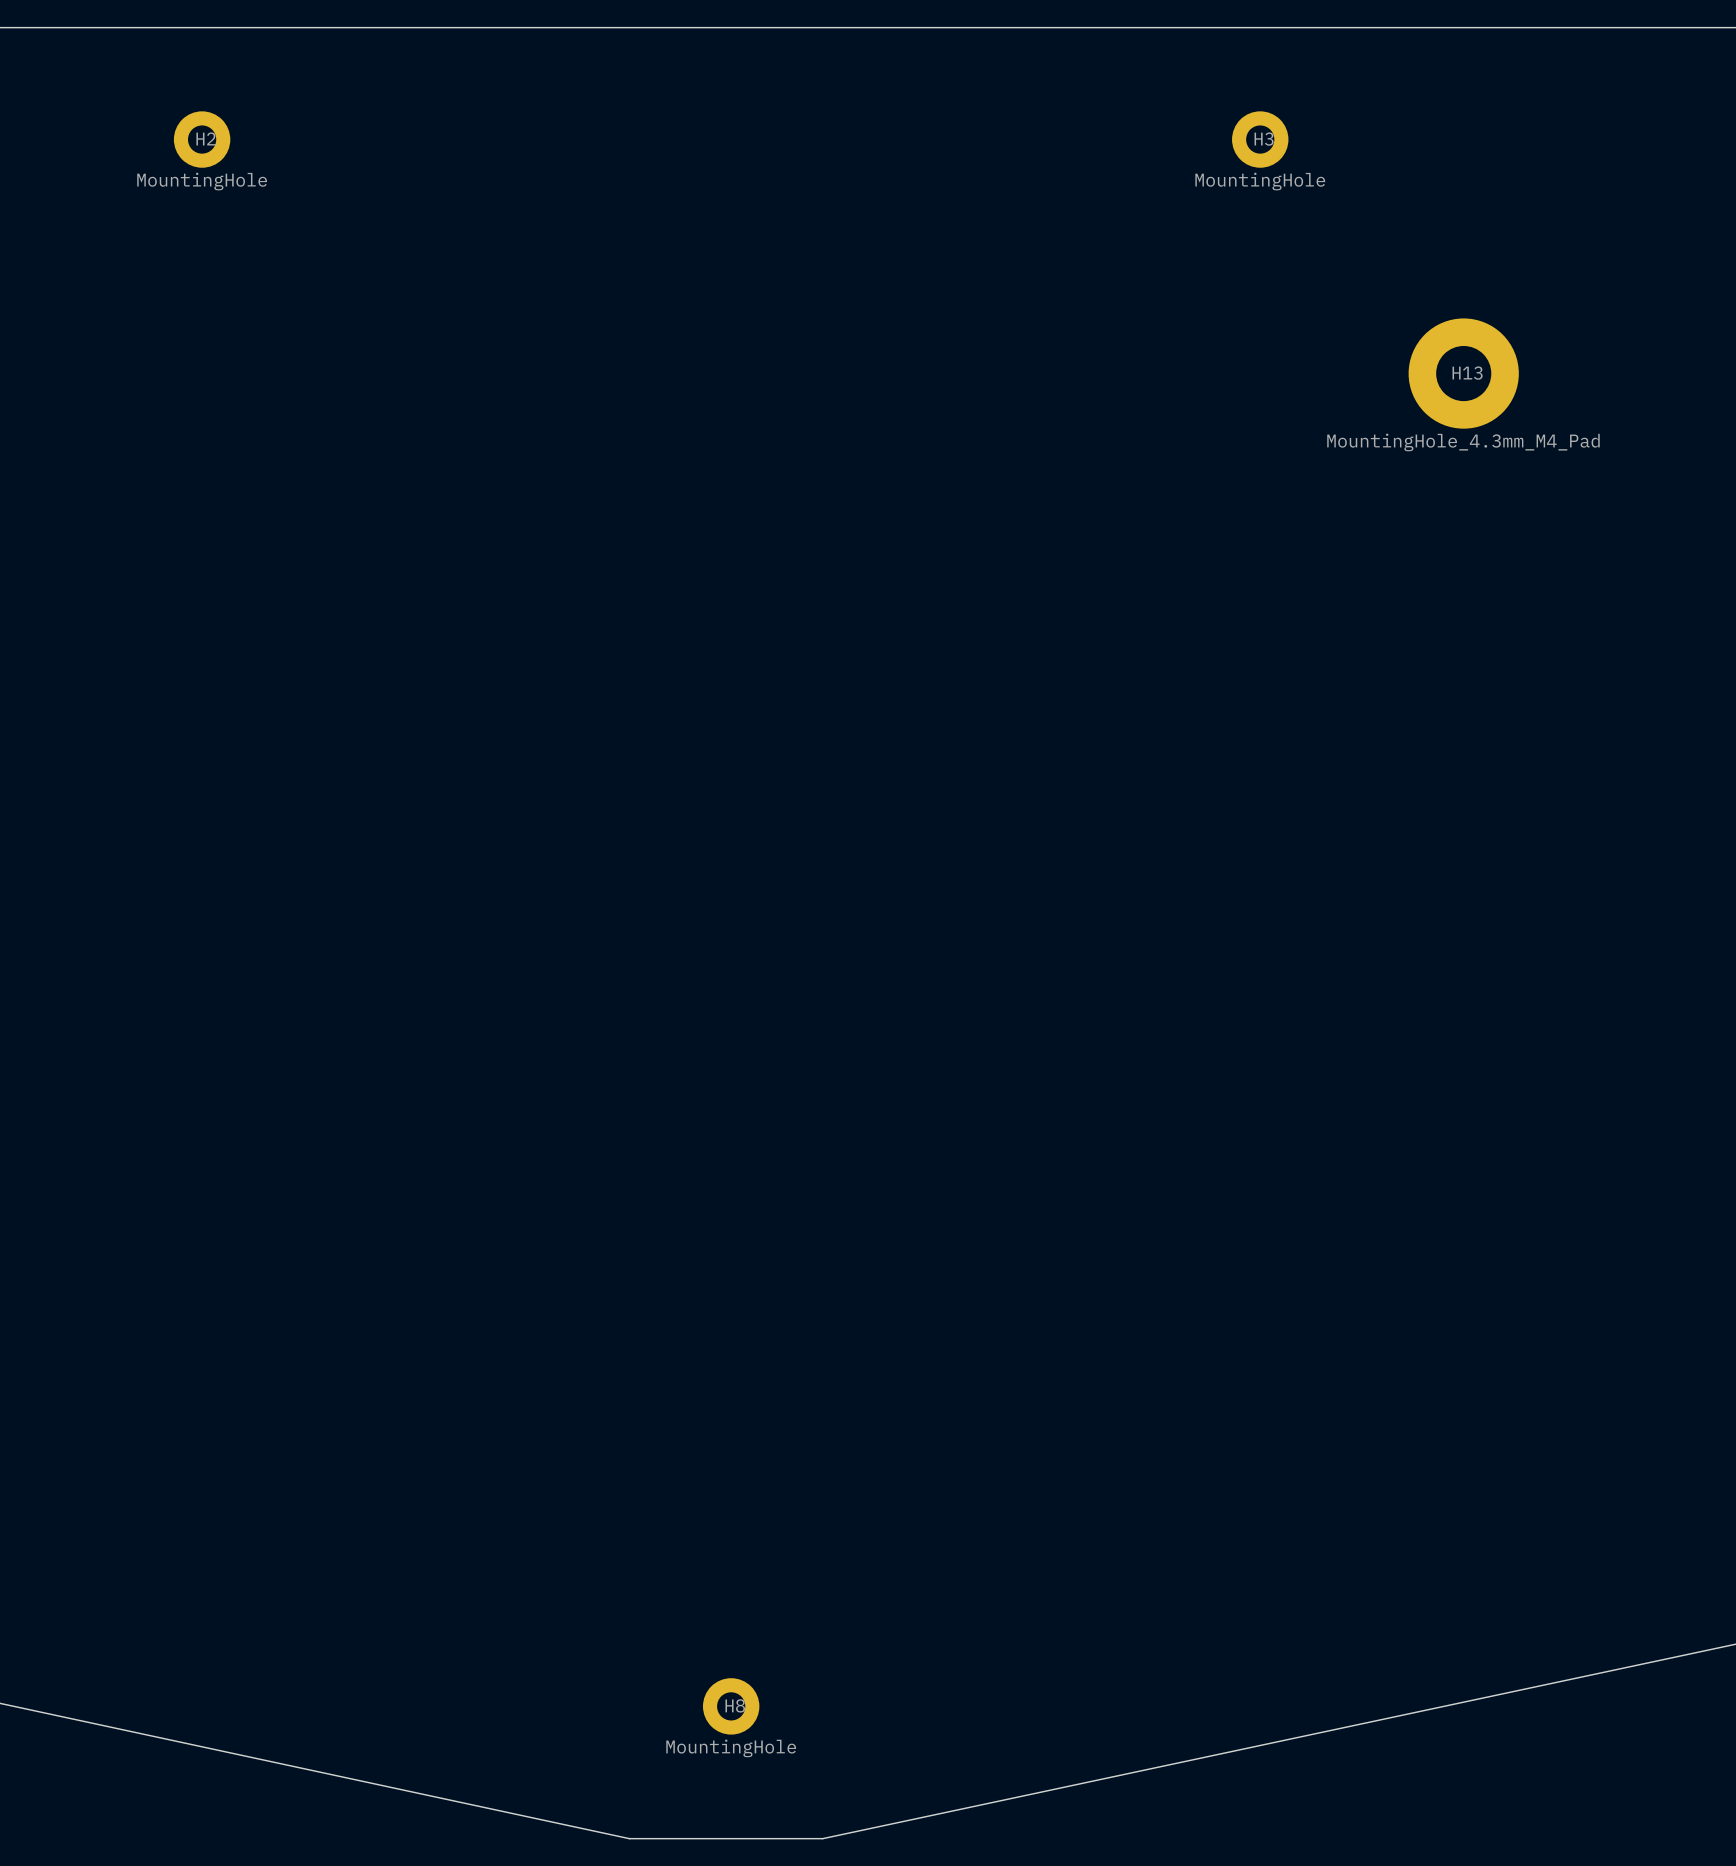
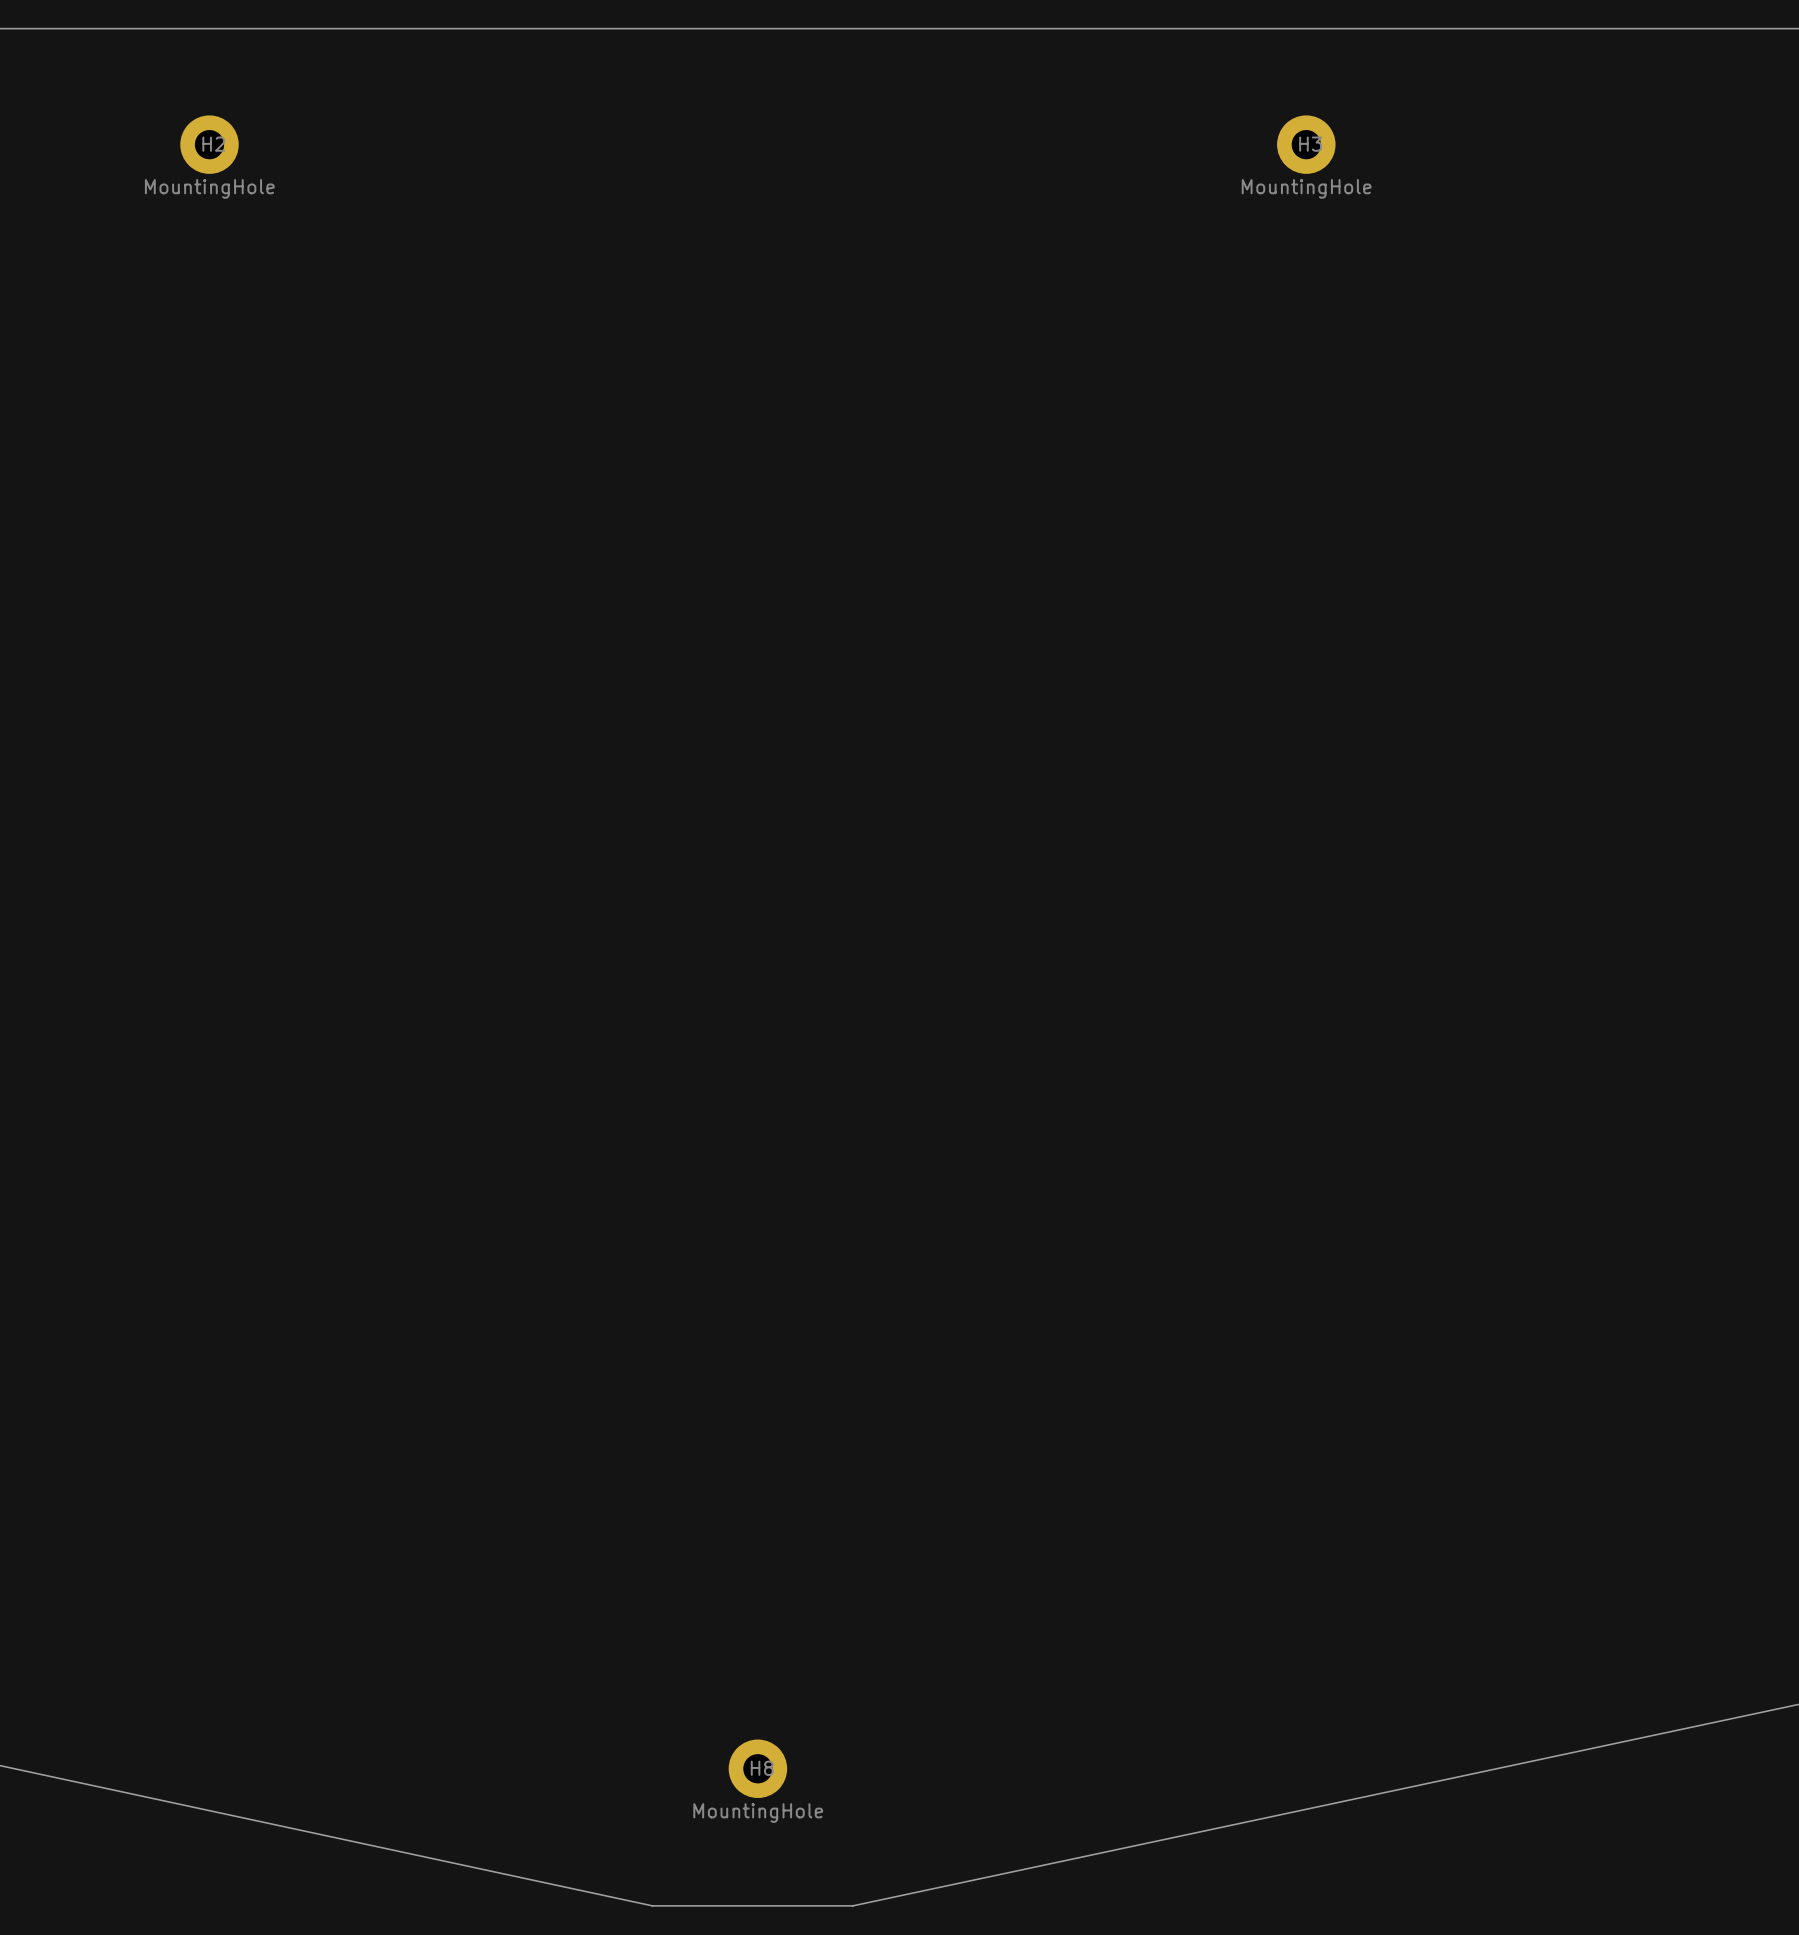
H13: MountingHole_4.3mm_M4_Pad (1463, 373) -> none

